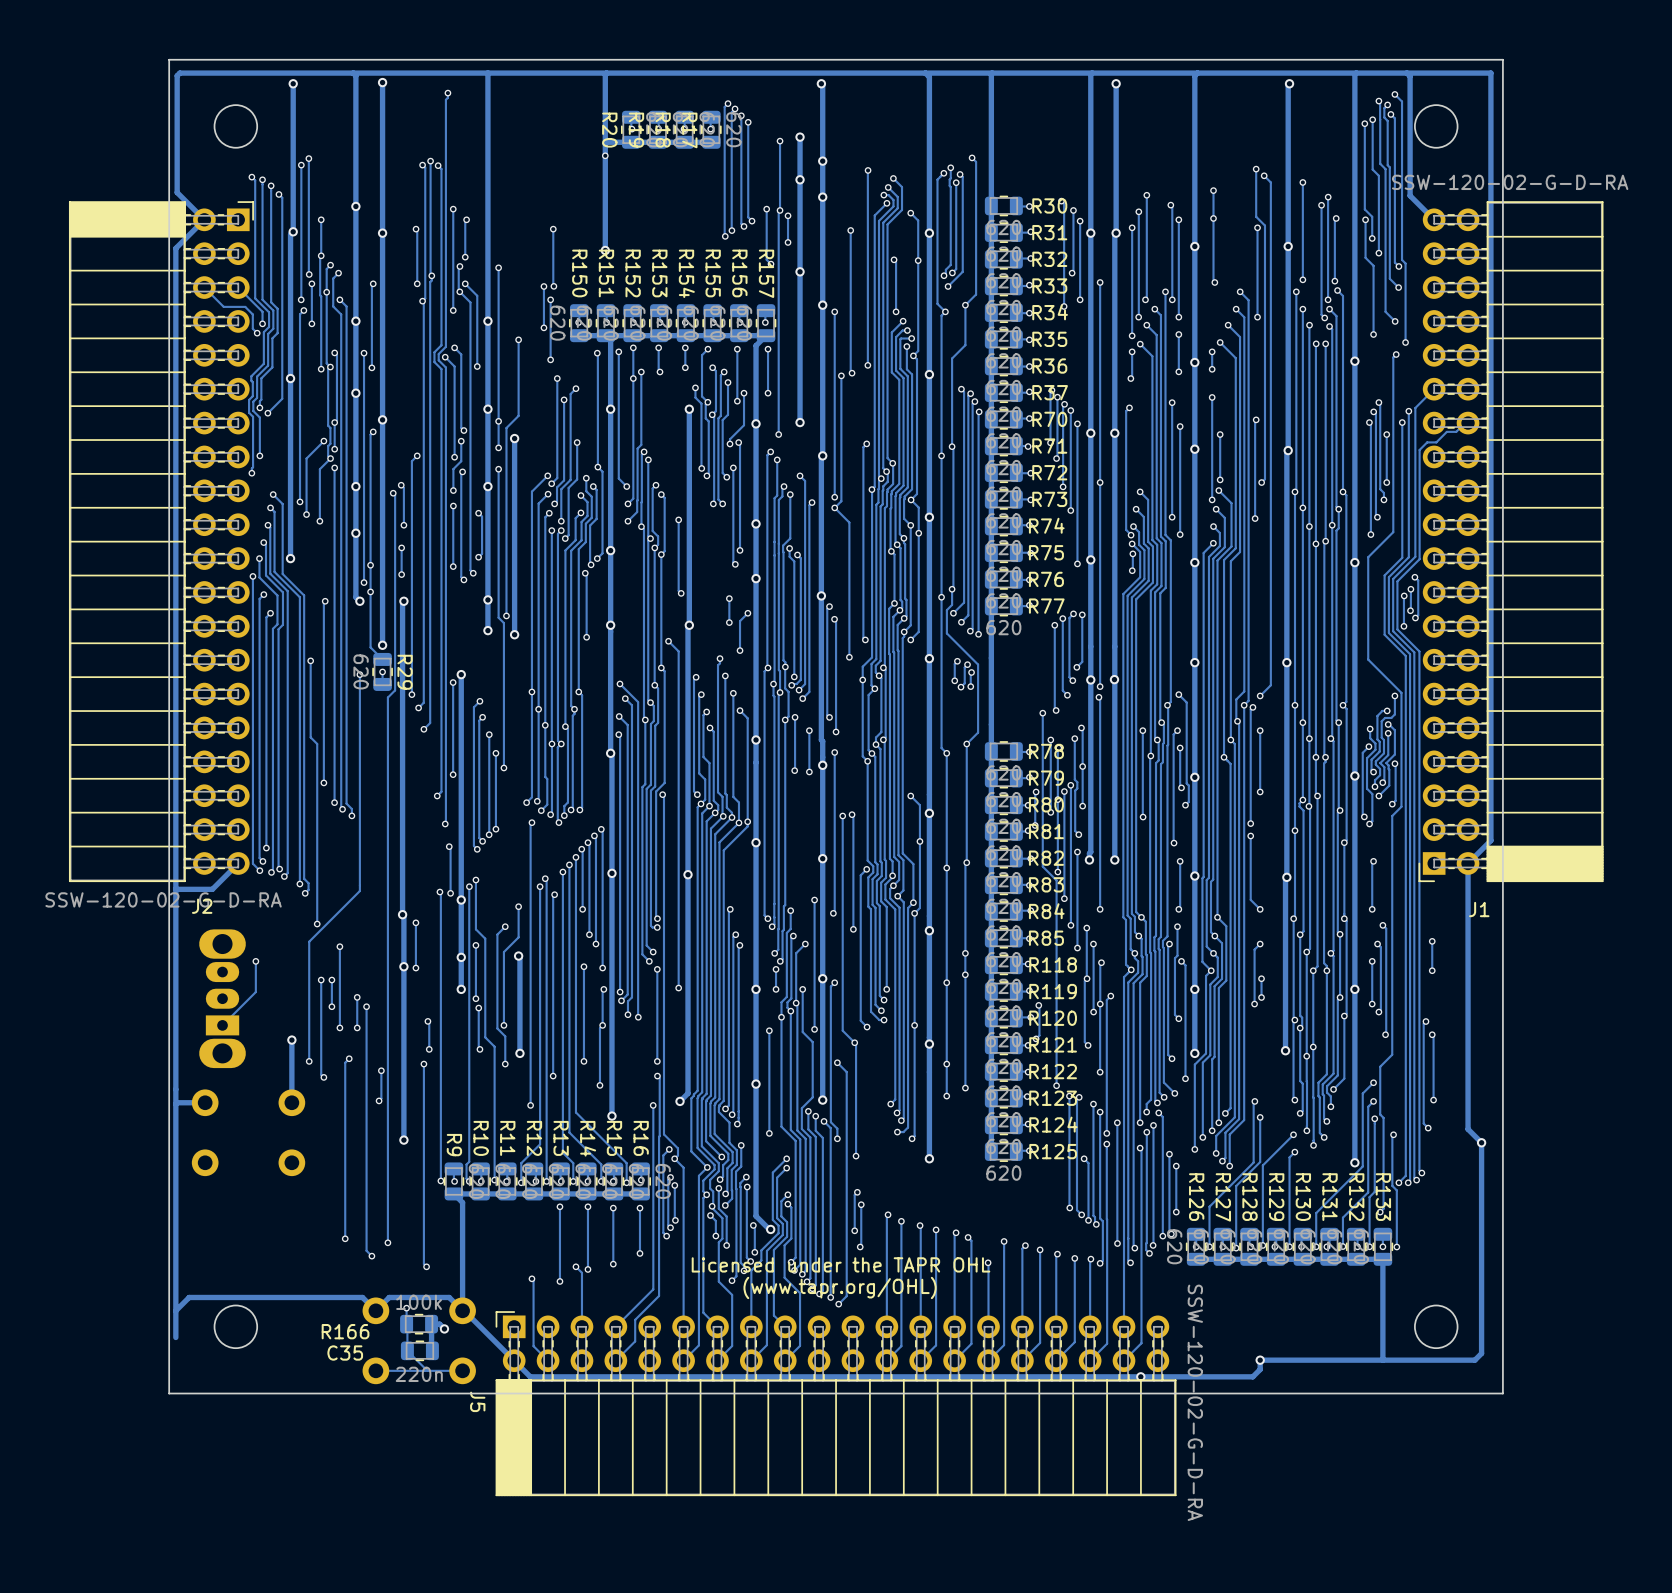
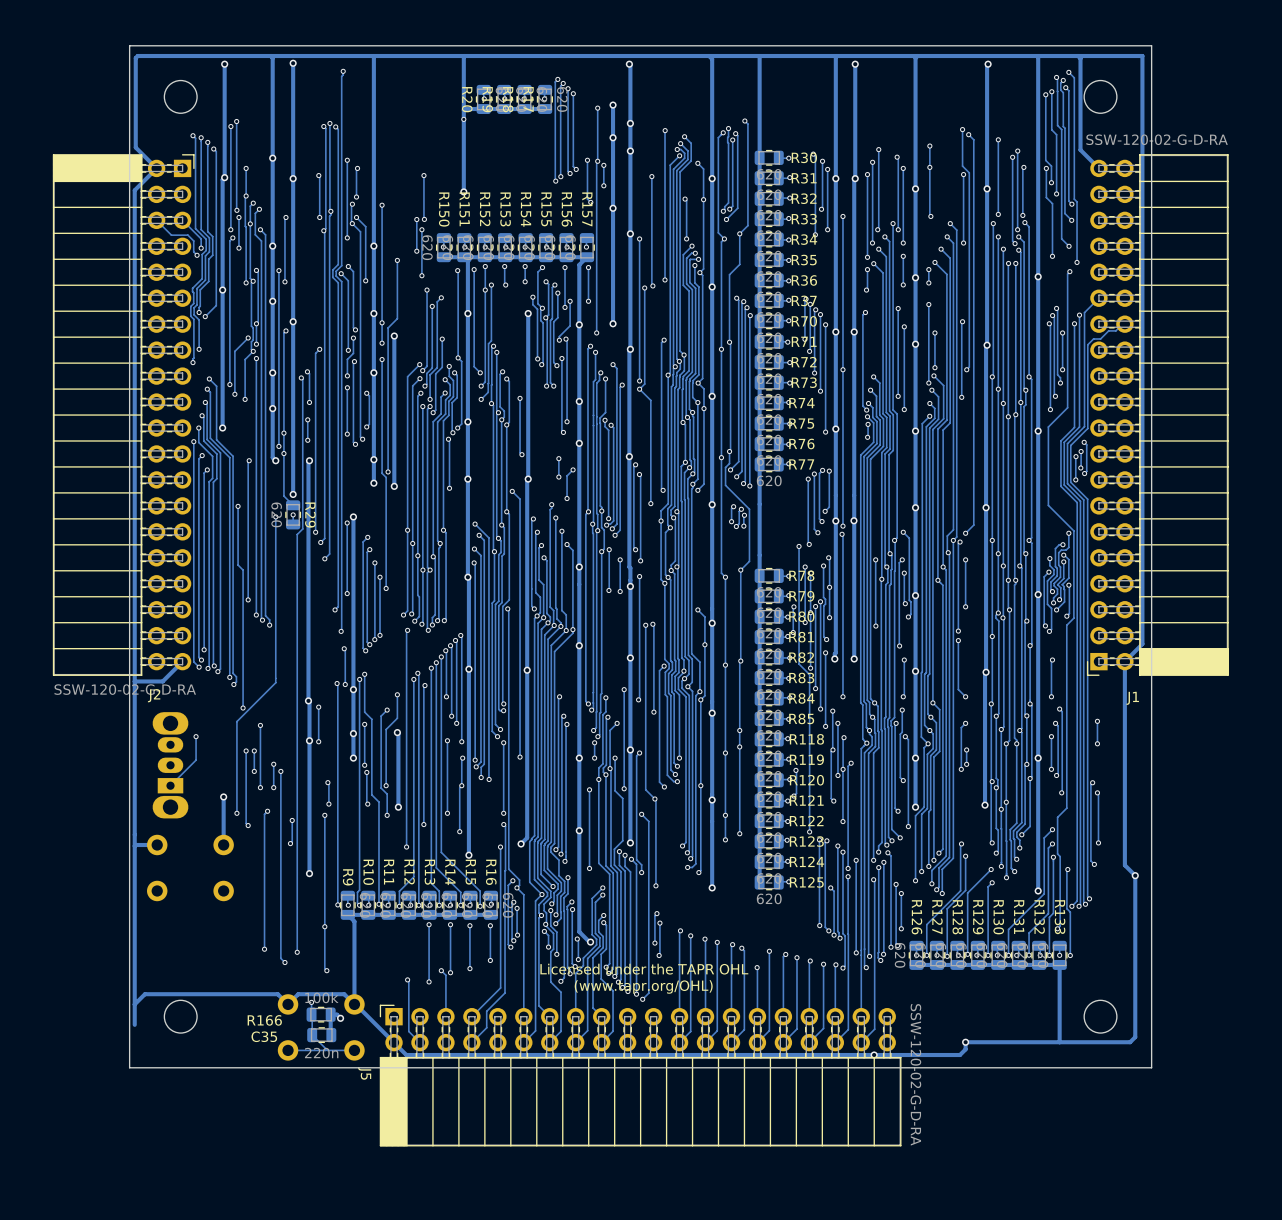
via: none -> (324, 926)

